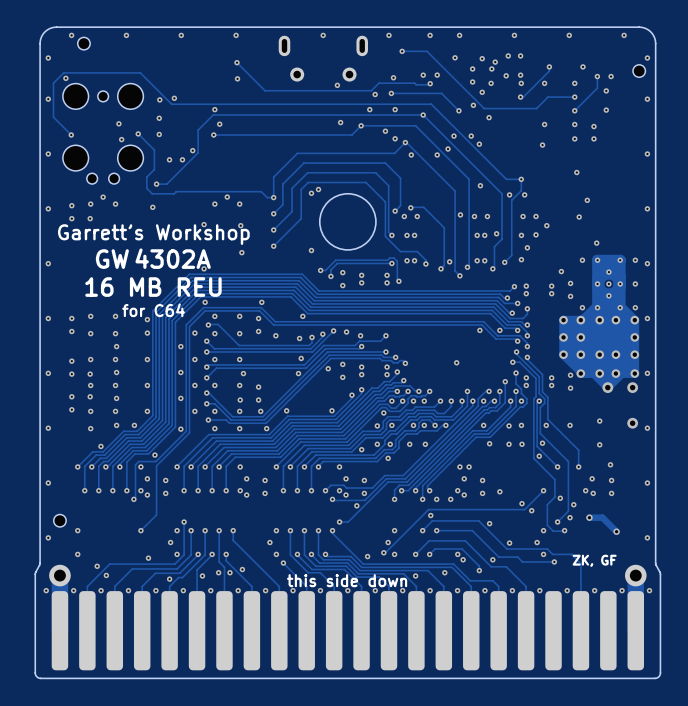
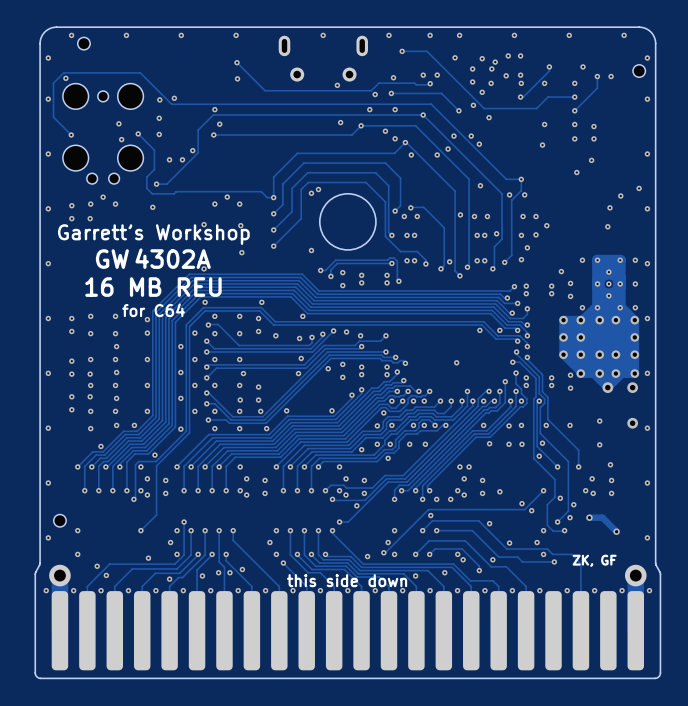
via: (606, 90) -> none
via: (606, 110) -> none
via: none -> (591, 160)
via: none -> (639, 188)
via: none -> (620, 196)
via: (587, 200) -> none
via: none -> (609, 207)
via: (579, 217) -> none
via: none -> (607, 226)
via: (596, 243) -> none

